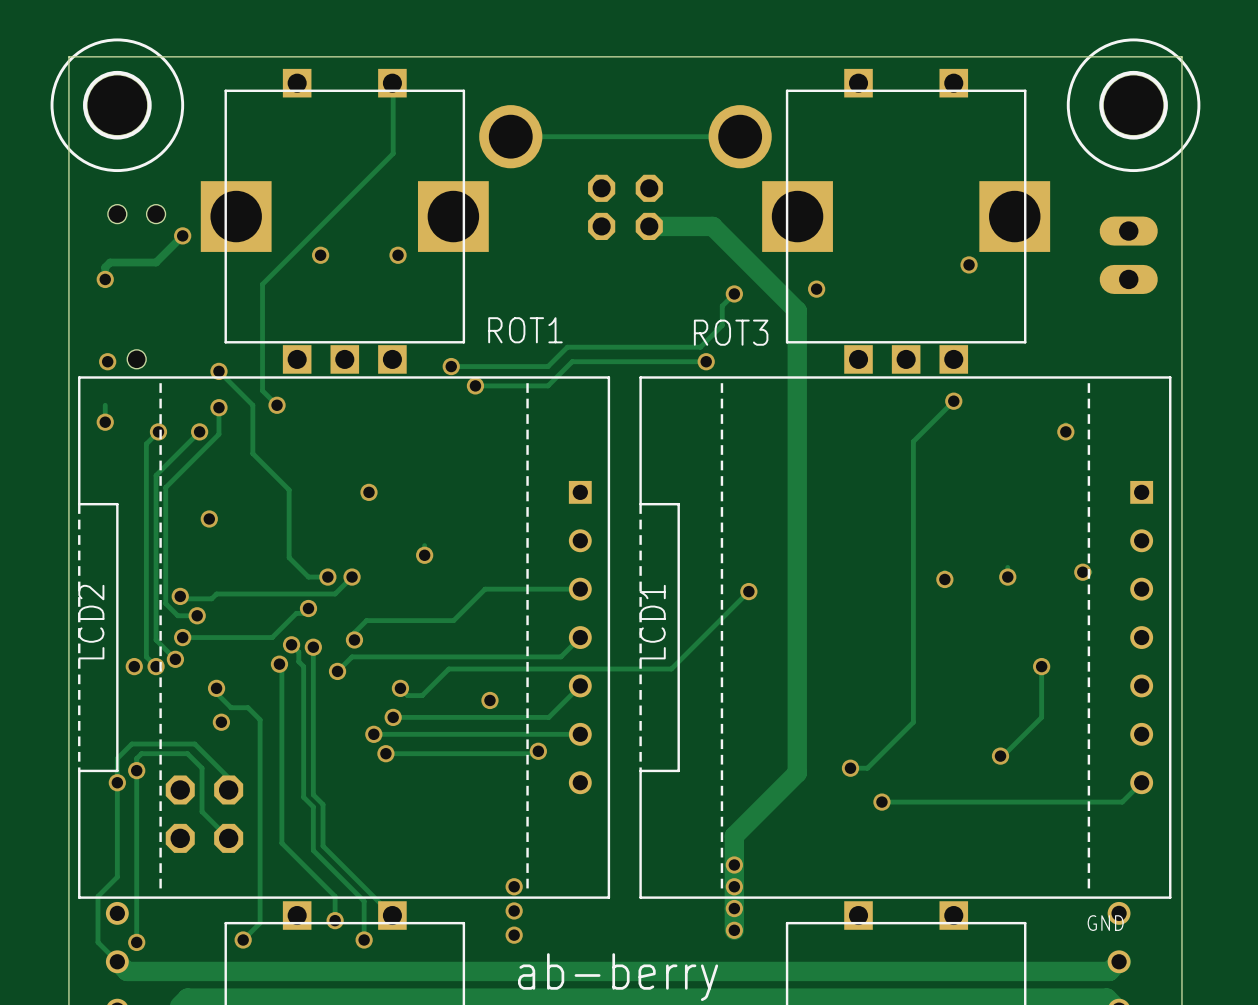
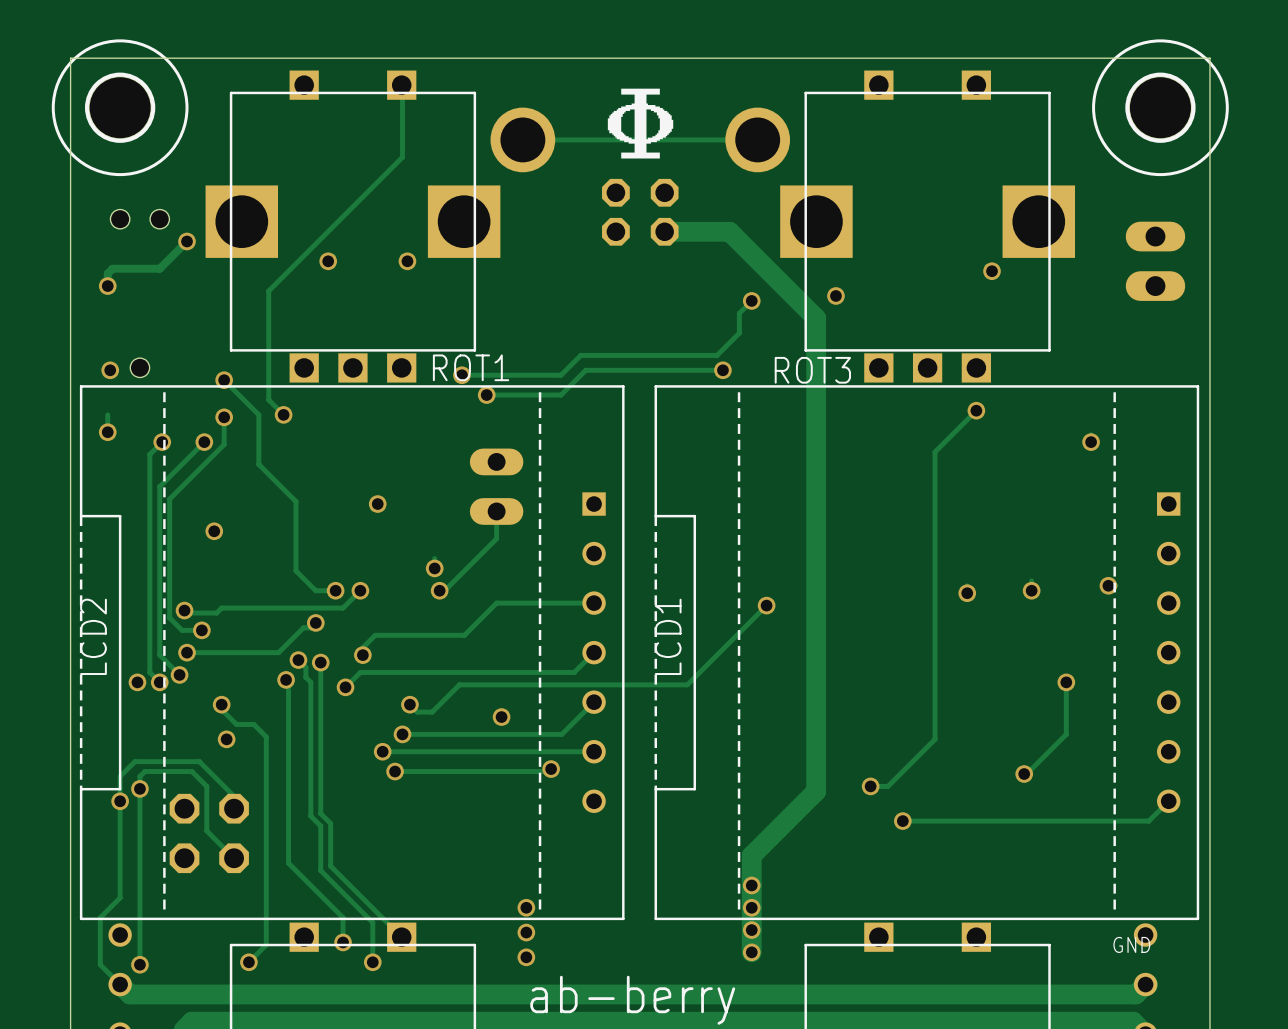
drawing: none -> [607, 88, 674, 159]
ROT1 name position: ROT1 (525, 330) -> ROT1 (471, 367)
ROT3 name position: ROT3 (731, 332) -> ROT3 (812, 370)
part: none -> (496, 486)
track: none -> (496, 511) (496, 538) (444, 590) (439, 590)
via: none -> (439, 590)

